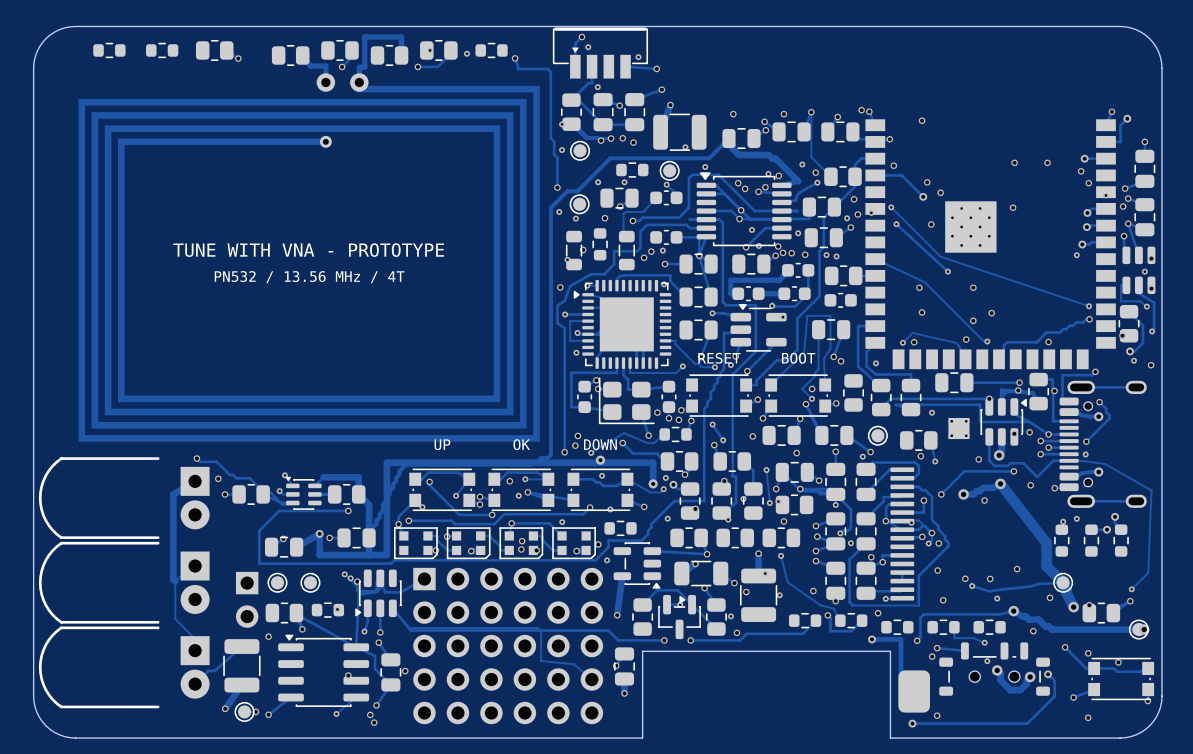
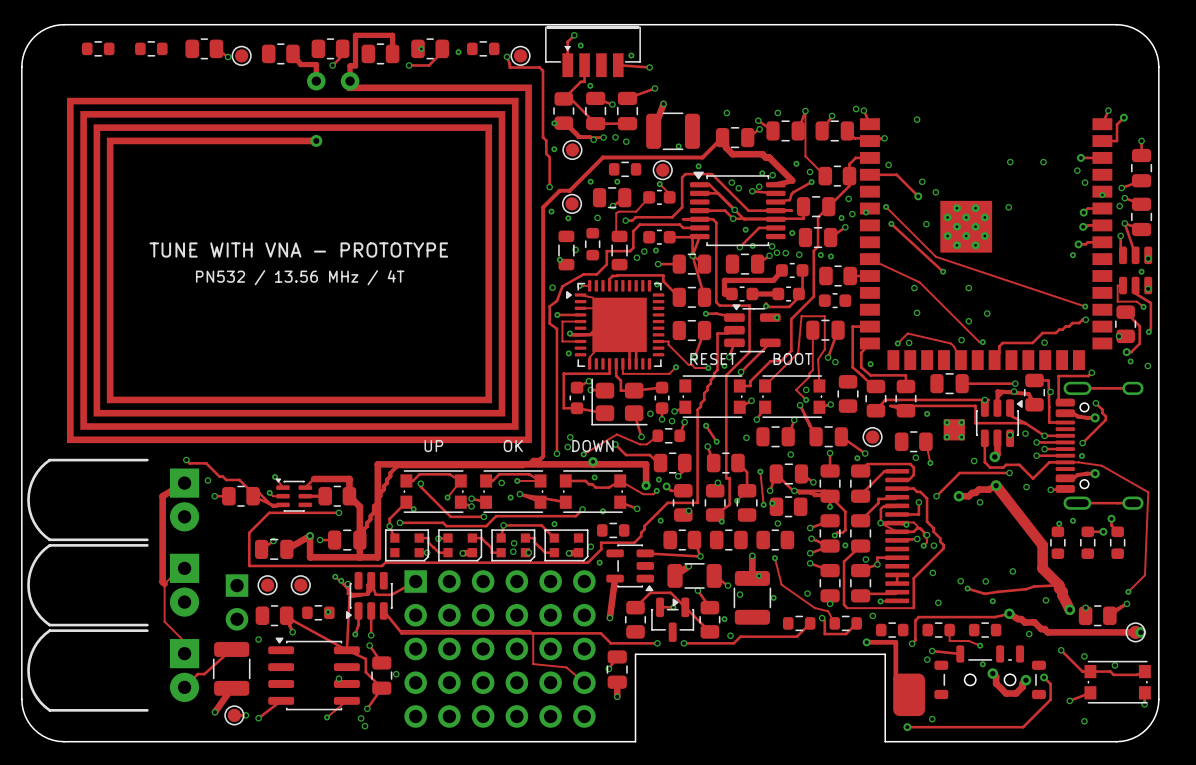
part: none -> (241, 55)
part: none -> (520, 55)
part: (1063, 582) -> none

